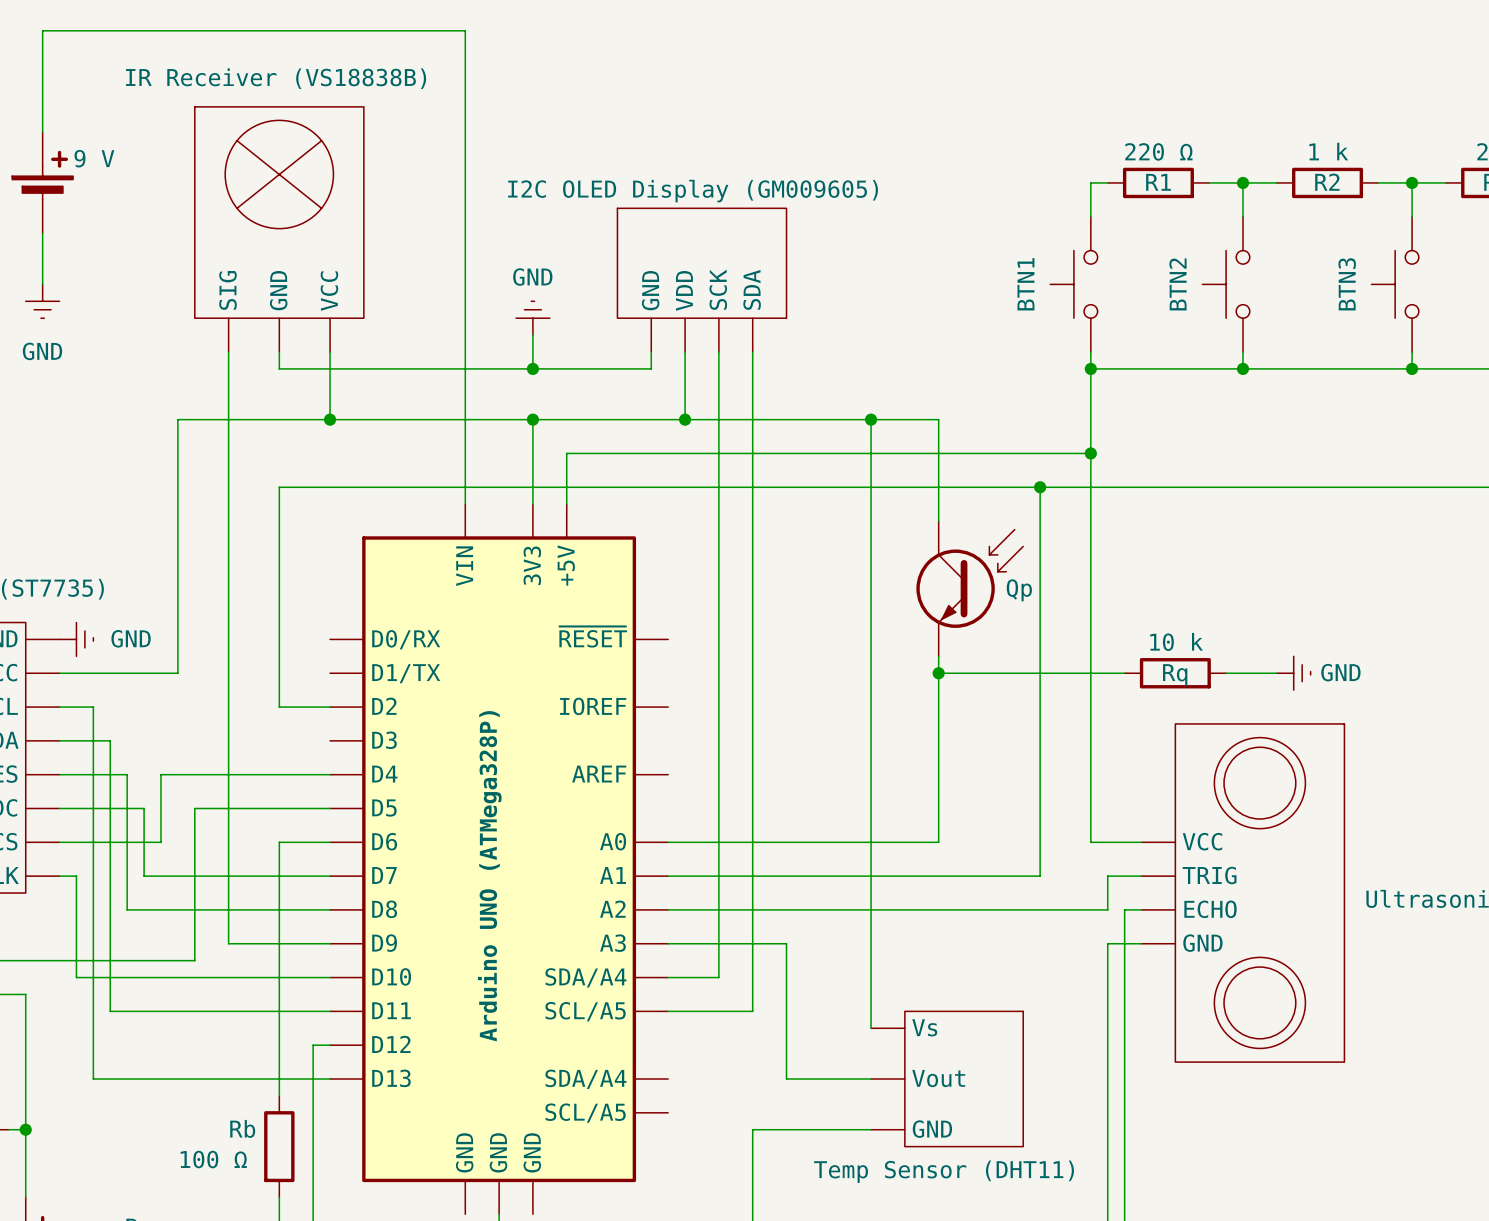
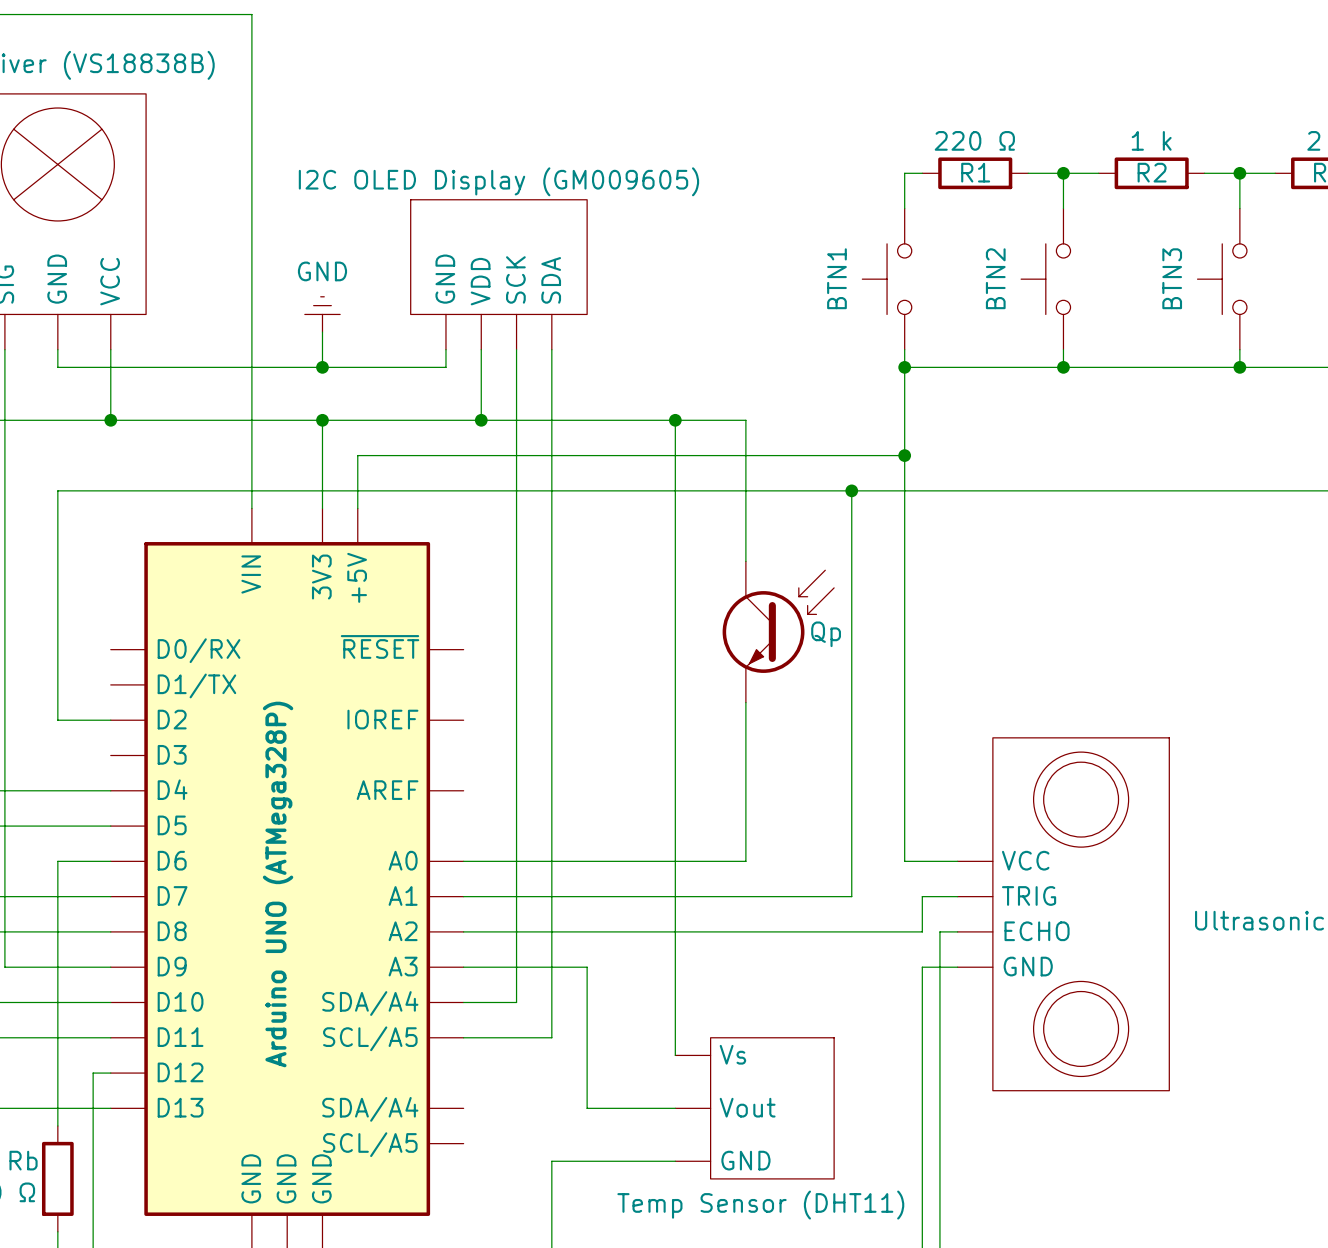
Qp position: (969, 588) -> (778, 632)
wire: (938, 673) (1124, 673) -> none
junction: (938, 673) -> none
Rq: 10 k (1175, 673) -> none
wire: (1226, 673) (1276, 673) -> none
power symbol: GND (1293, 673) -> none

